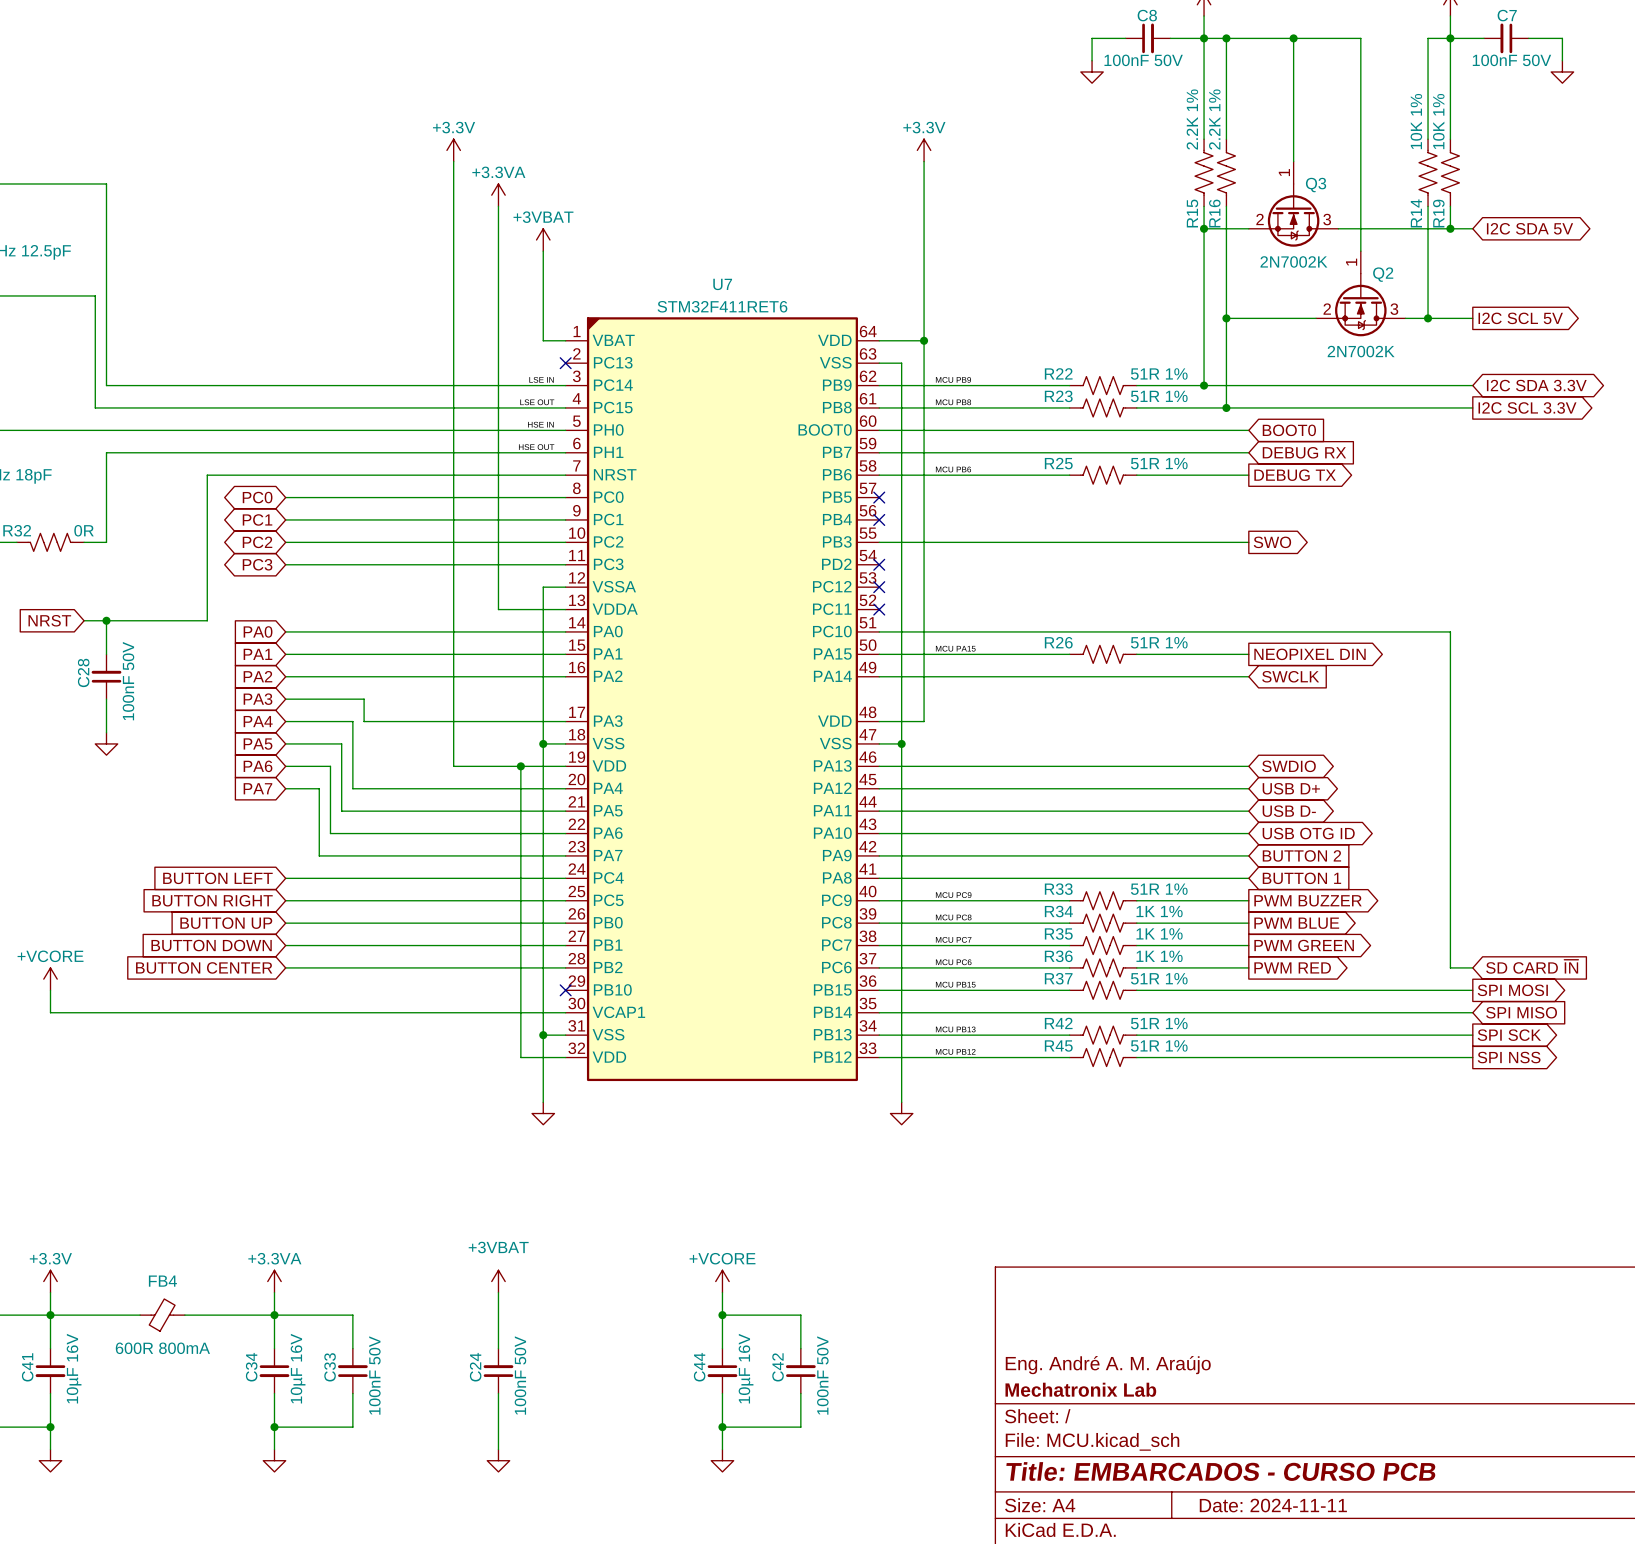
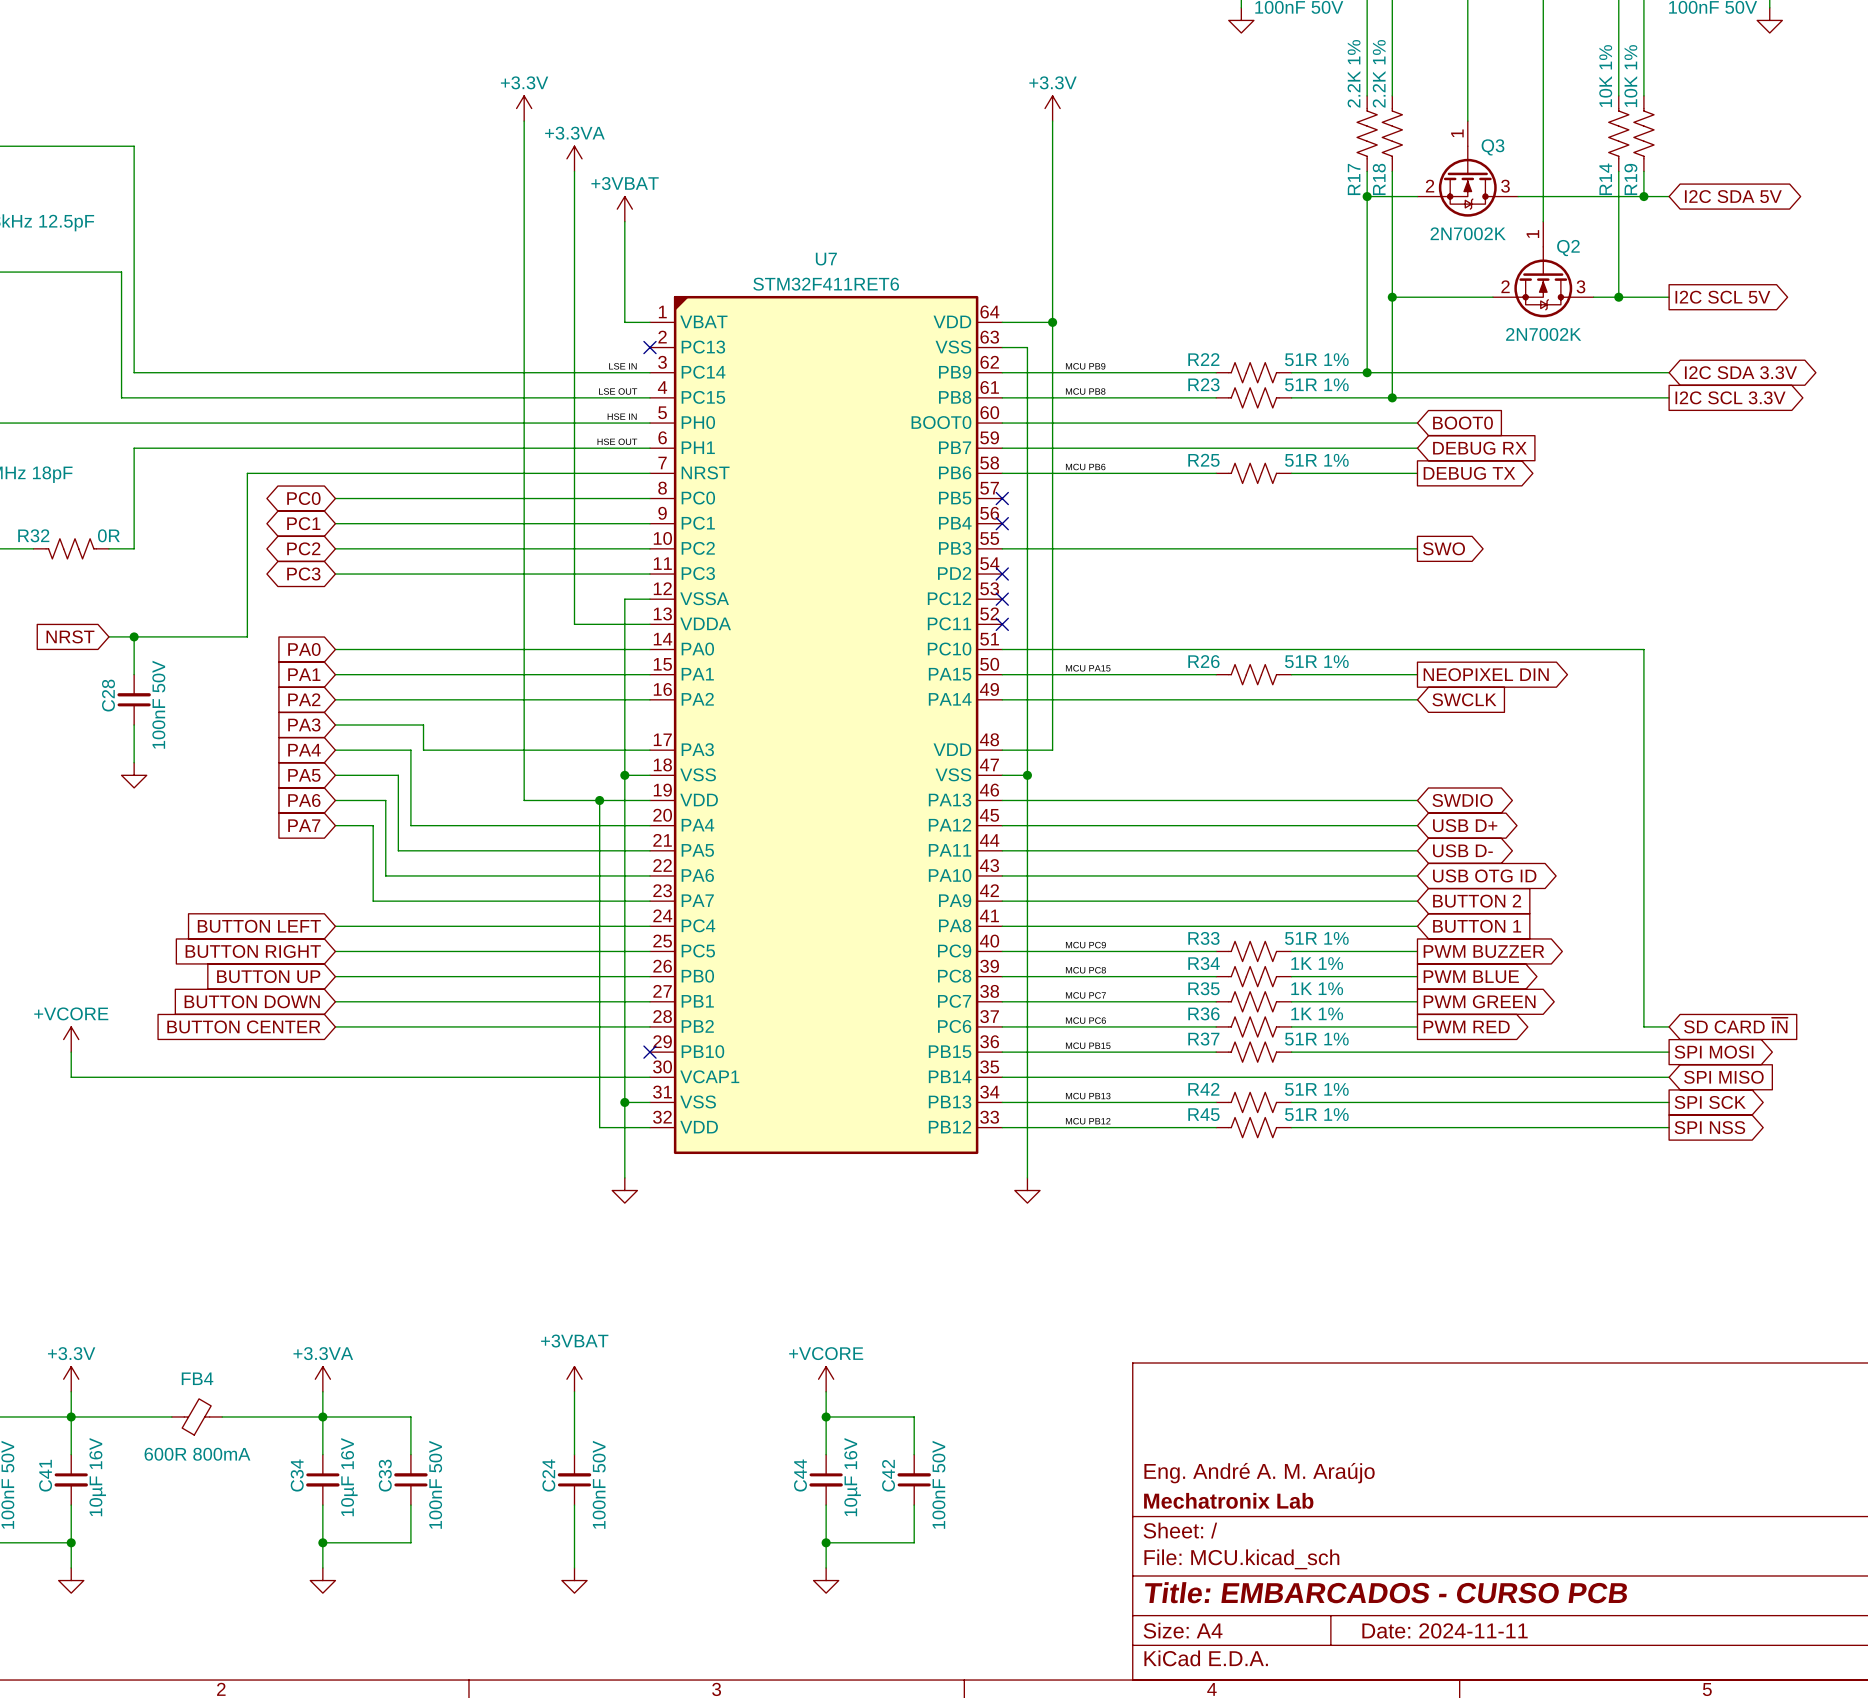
R15 name: R15 (1192, 213) -> R17 (1354, 179)
R16 name: R16 (1214, 213) -> R18 (1379, 179)

